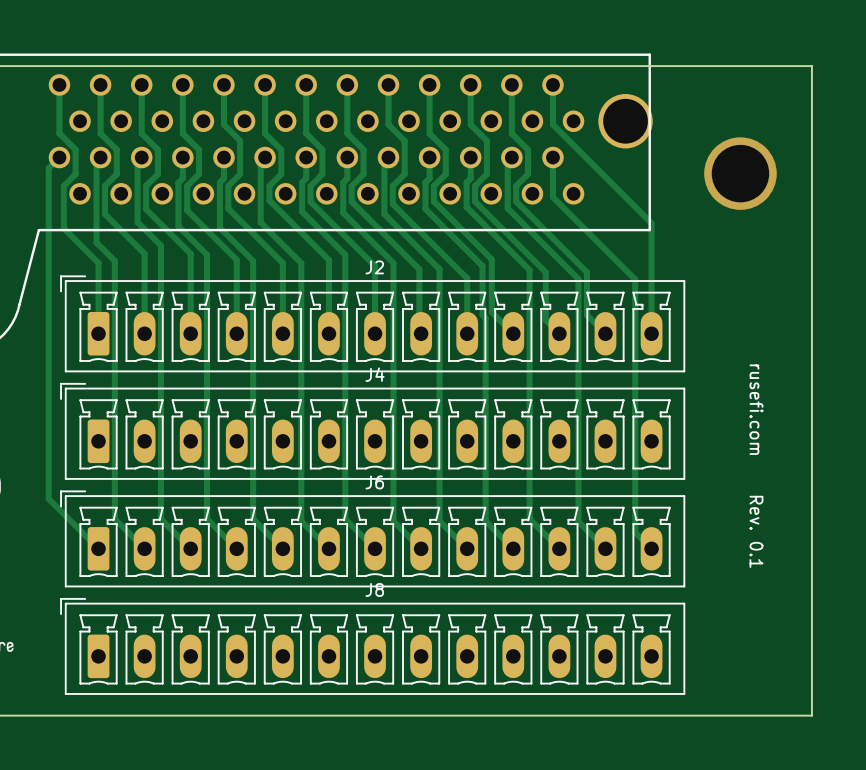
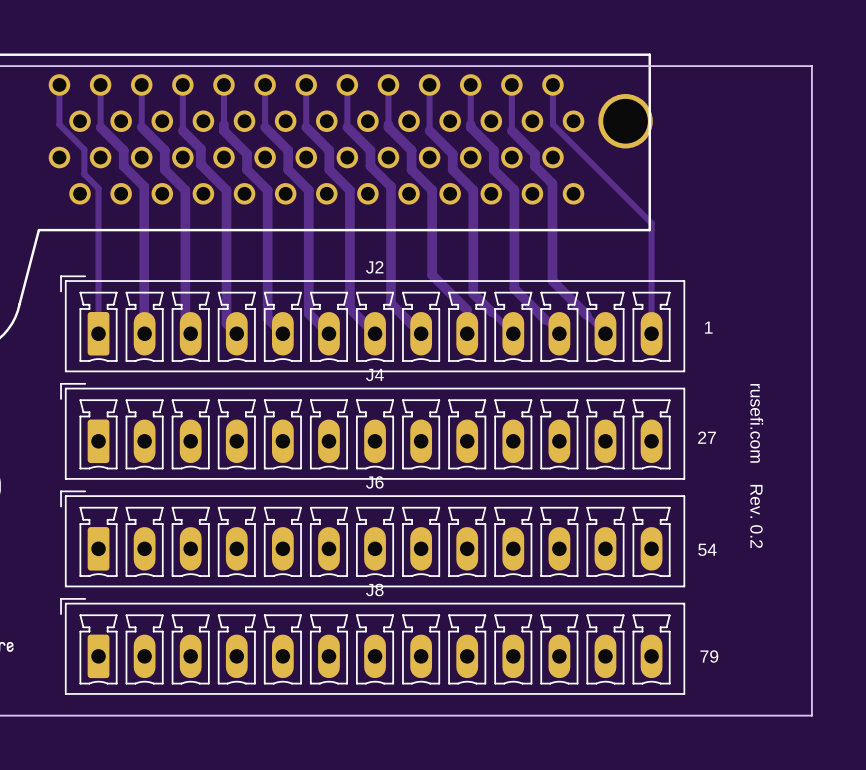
track: (59, 124) (59, 133) (75, 149) (75, 174) (63, 186) (63, 228) (98, 263) -> (59, 124) (84, 149) (84, 174) (98, 188) (98, 263)
track: (223, 124) (240, 140) (240, 174) (228, 186) (228, 208) (282, 263) (282, 333) -> (223, 124) (223, 130) (247, 153) (247, 169) (267, 190) (267, 318) (282, 333)
track: (388, 124) (404, 140) (404, 174) (392, 186) (392, 204) (467, 278) (467, 310) -> (388, 124) (388, 127) (411, 150) (411, 169) (432, 190) (432, 275) (467, 310)
track: (470, 124) (486, 140) (486, 174) (475, 186) (475, 201) (545, 272) (545, 320) -> (470, 124) (470, 127) (493, 150) (493, 169) (514, 190) (514, 288) (545, 320)
track: (100, 127) (100, 133) (116, 149) (116, 174) (104, 186) (104, 214) (144, 253) (144, 333) -> (100, 127) (123, 150) (123, 166) (144, 186) (144, 333)
track: (141, 127) (141, 133) (157, 149) (157, 174) (146, 186) (146, 209) (190, 253) (190, 333) -> (141, 127) (164, 150) (164, 169) (185, 190) (185, 328) (190, 333)
track: (265, 127) (265, 133) (281, 149) (281, 174) (269, 186) (269, 200) (328, 260) (328, 333) -> (265, 127) (288, 150) (288, 169) (308, 190) (308, 313) (328, 333)
track: (306, 127) (306, 133) (322, 149) (322, 174) (310, 186) (310, 201) (375, 266) (375, 333) -> (306, 127) (329, 150) (329, 169) (349, 190) (349, 308) (375, 333)
track: (347, 127) (347, 133) (363, 149) (363, 174) (351, 186) (351, 201) (419, 269) (419, 332) -> (347, 127) (370, 150) (370, 166) (391, 186) (391, 303) (419, 332)
track: (182, 130) (182, 133) (199, 149) (199, 174) (187, 186) (187, 210) (236, 260) (236, 333) -> (182, 130) (200, 148) (200, 164) (226, 190) (226, 323) (236, 333)
track: (429, 130) (429, 133) (445, 149) (445, 174) (433, 186) (433, 201) (491, 259) (491, 312) -> (429, 130) (452, 153) (452, 169) (473, 190) (473, 293) (491, 312)
track: (511, 130) (511, 133) (528, 149) (528, 174) (516, 186) (516, 201) (586, 272) (586, 315) -> (511, 130) (534, 153) (534, 166) (552, 183) (552, 280) (586, 315)
track: (59, 157) (48, 168) (48, 499) (98, 548) -> none
track: (100, 157) (96, 161) (96, 242) (114, 260) (114, 519) (144, 548) -> none
track: (141, 157) (137, 161) (137, 222) (160, 245) (160, 519) (190, 548) -> none
track: (182, 157) (182, 178) (178, 182) (178, 226) (207, 254) (207, 519) (236, 548) -> none
track: (223, 157) (223, 178) (219, 182) (219, 227) (253, 260) (253, 519) (282, 548) -> none
track: (265, 157) (260, 161) (260, 222) (301, 263) (301, 521) (328, 548) -> none
track: (306, 157) (306, 178) (302, 182) (302, 211) (345, 254) (345, 519) (375, 548) -> none
track: (347, 157) (347, 178) (343, 182) (343, 212) (393, 263) (393, 521) (421, 548) -> none
track: (388, 157) (384, 161) (384, 214) (439, 269) (439, 521) (467, 548) -> none
track: (429, 157) (429, 178) (425, 182) (425, 209) (482, 266) (482, 315) (485, 318) (485, 521) (513, 548) -> none
track: (470, 157) (470, 178) (466, 182) (466, 207) (529, 270) (529, 519) (559, 548) -> none
track: (511, 157) (507, 161) (507, 208) (578, 279) (578, 521) (605, 548) -> none
track: (552, 157) (552, 197) (635, 279) (635, 532) (651, 548) -> none
via: (740, 173) -> none
text: none -> 1 (708, 327)
text: none -> 27 (707, 437)
text: rusefi.com Rev. 0.1 (756, 466) -> rusefi.com Rev. 0.2 (756, 466)
text: none -> 54 (707, 549)
text: none -> 79 (709, 656)

